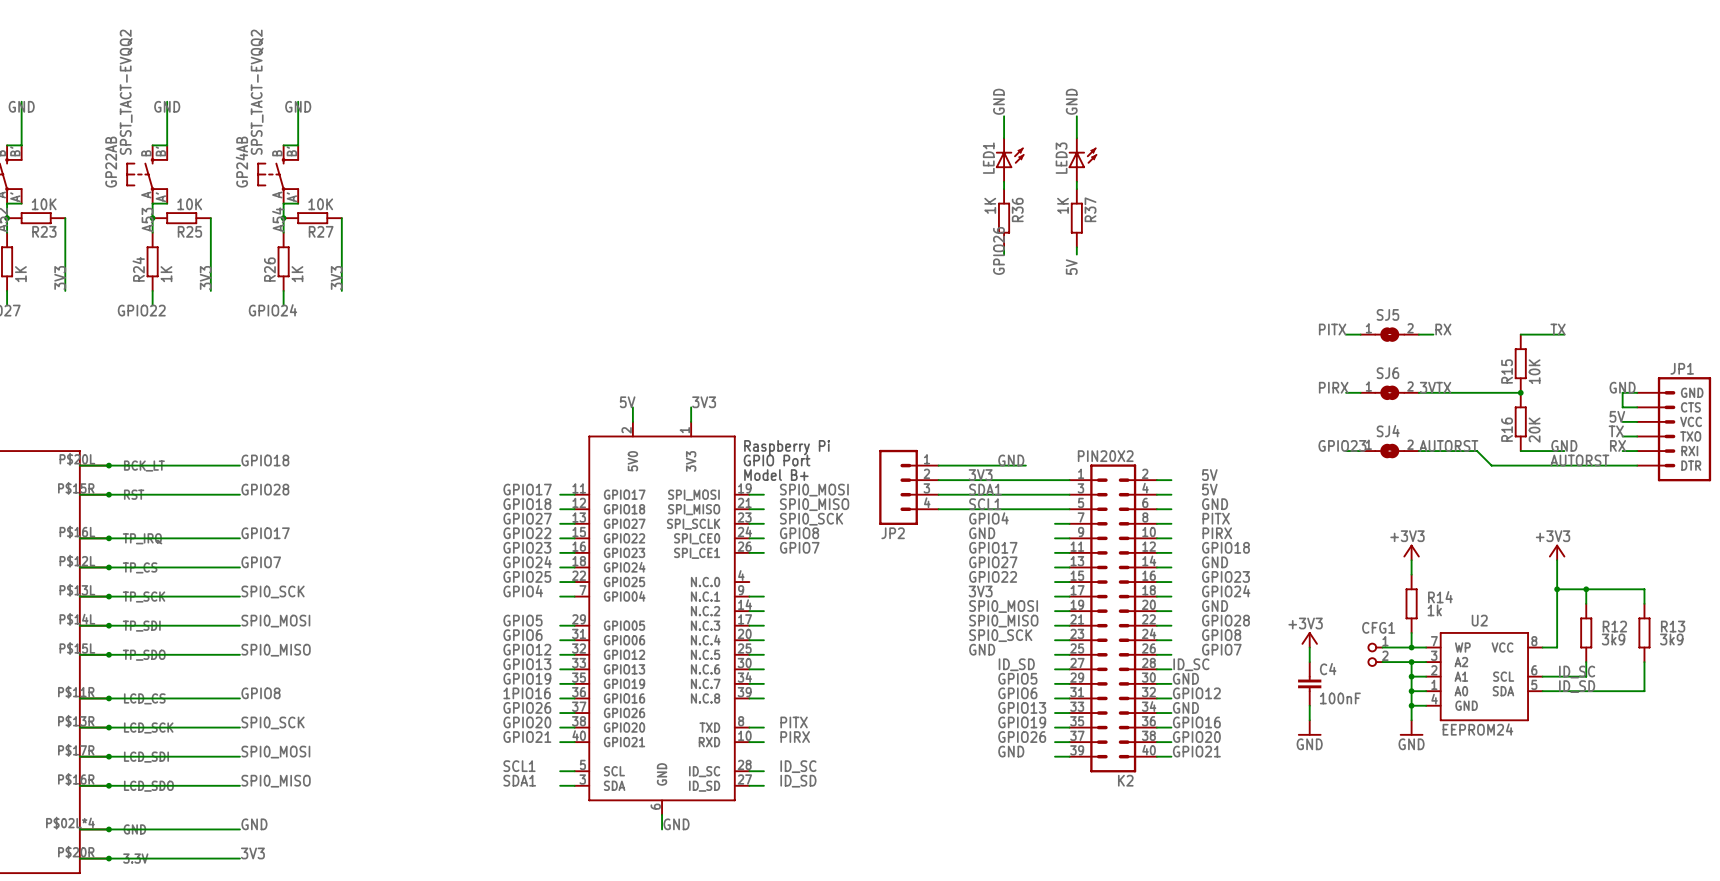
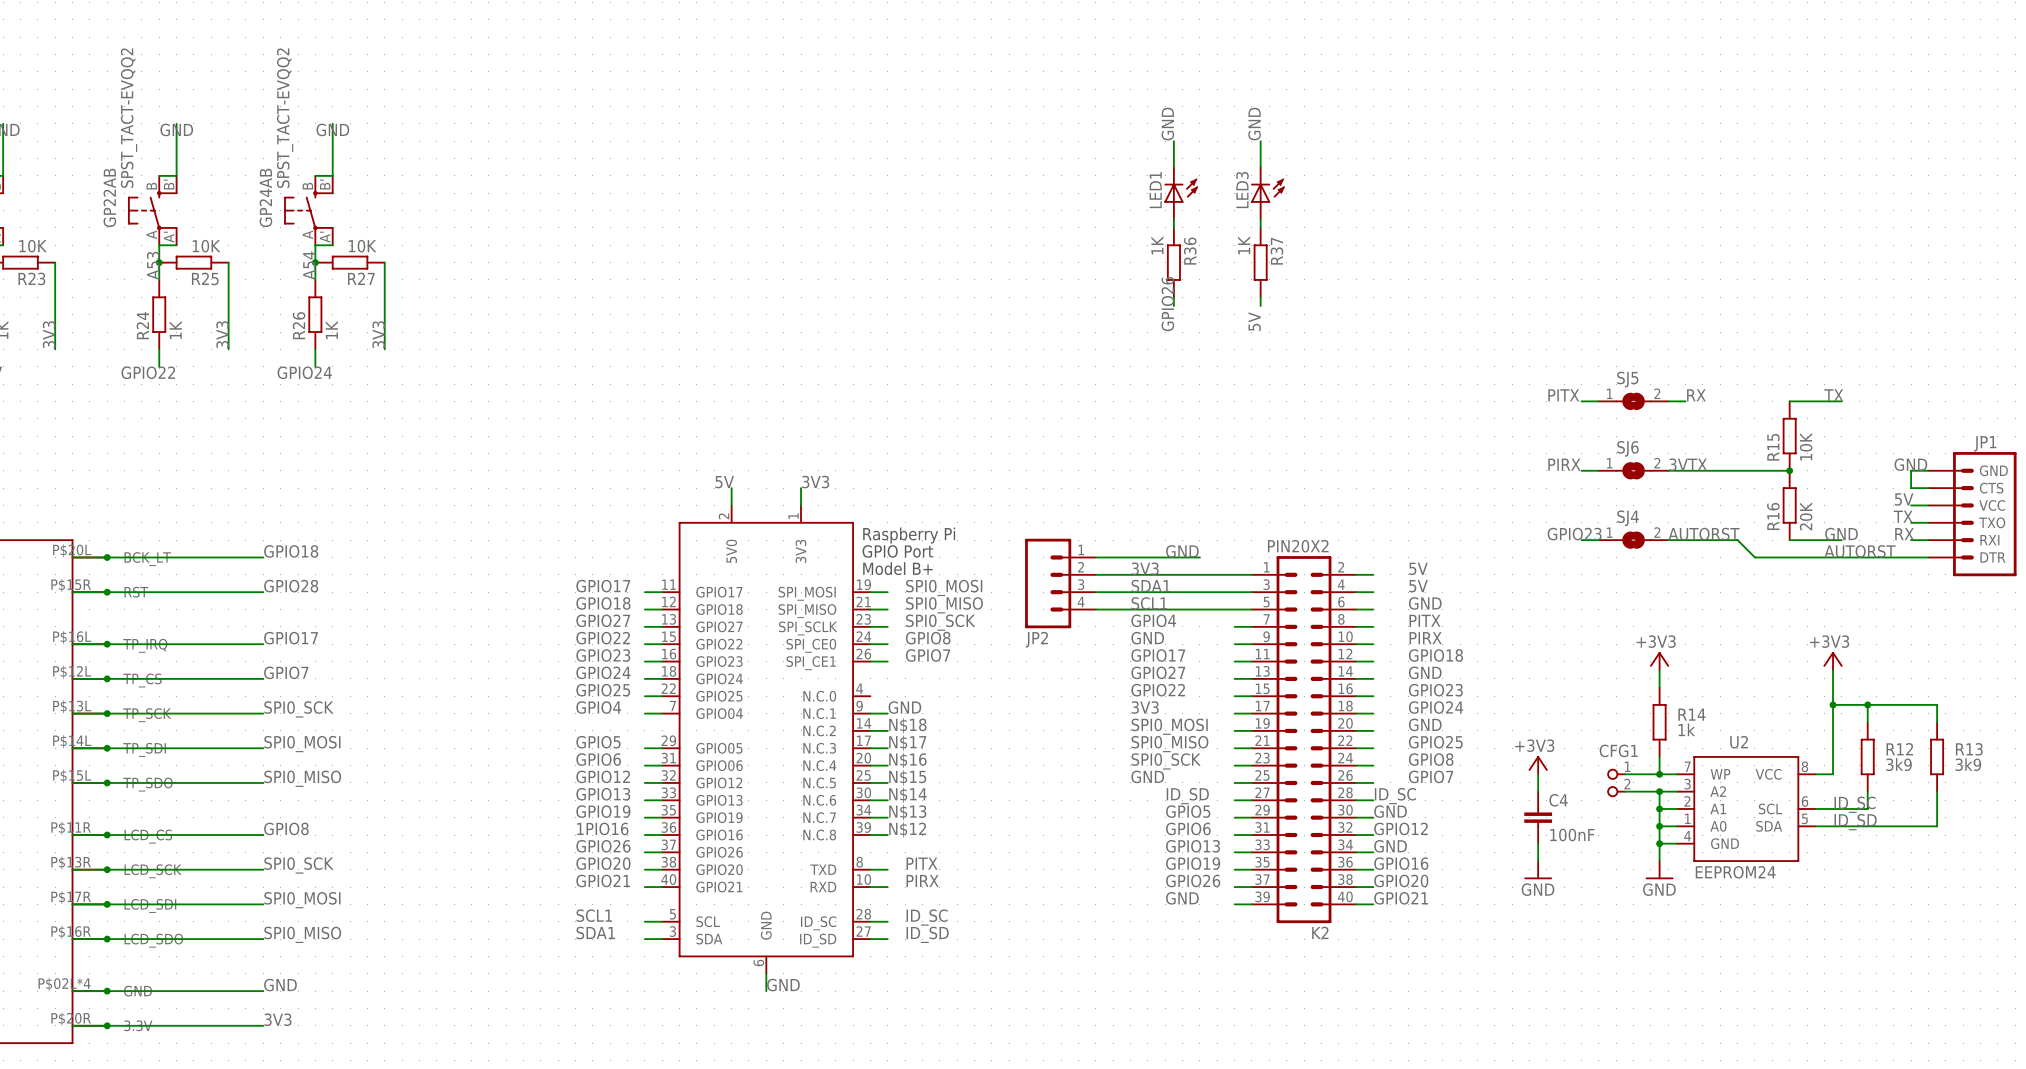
label: none -> GND (904, 707)
label: none -> N$18 (907, 725)
label: none -> N$17 (907, 743)
label: GPIO28 (1225, 620) -> GPIO25 (1435, 742)
label: none -> N$16 (907, 760)
label: none -> N$15 (907, 777)
label: none -> N$14 (907, 795)
label: none -> N$13 (907, 812)
label: none -> N$12 (907, 829)

